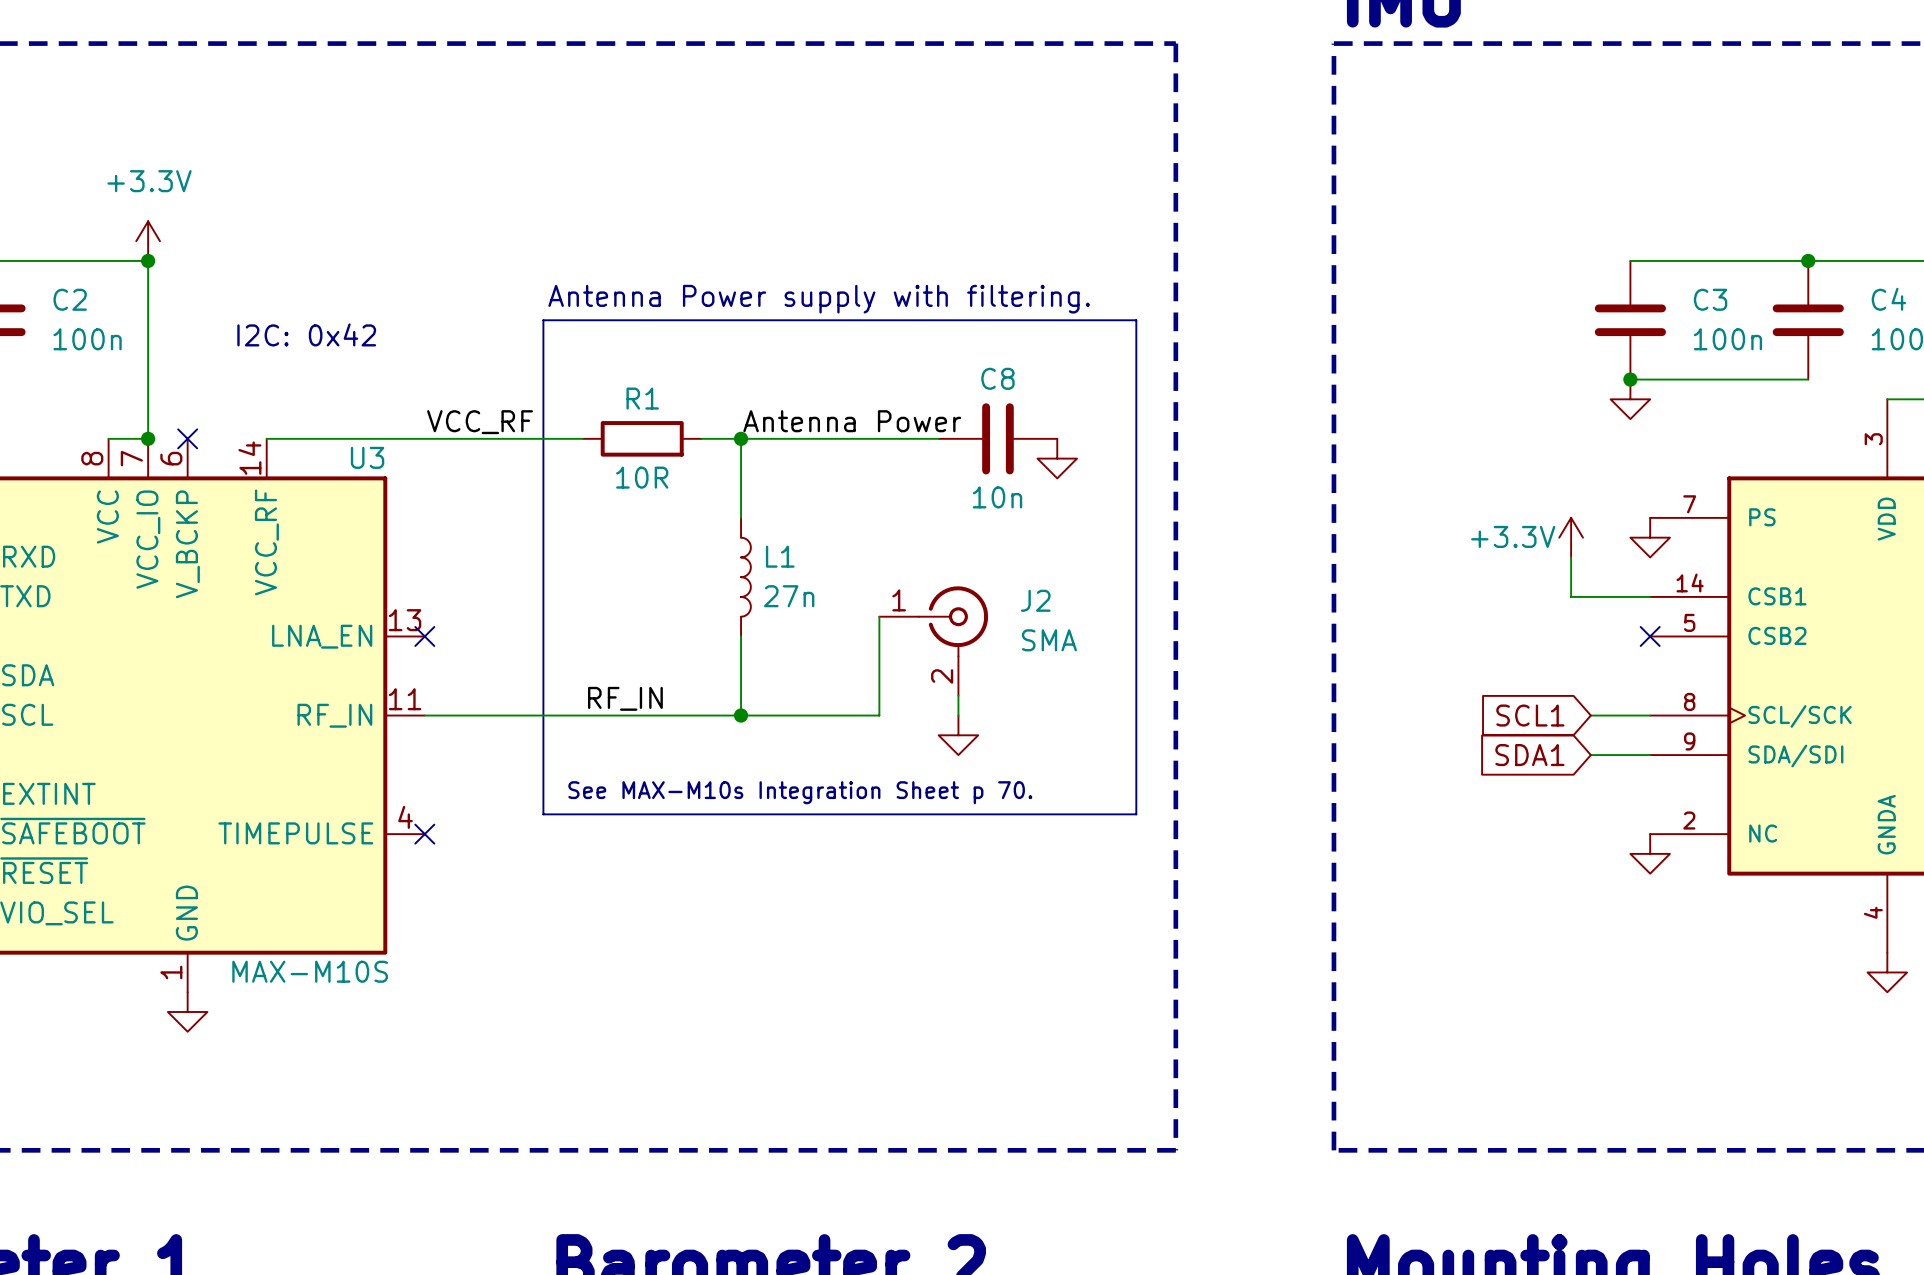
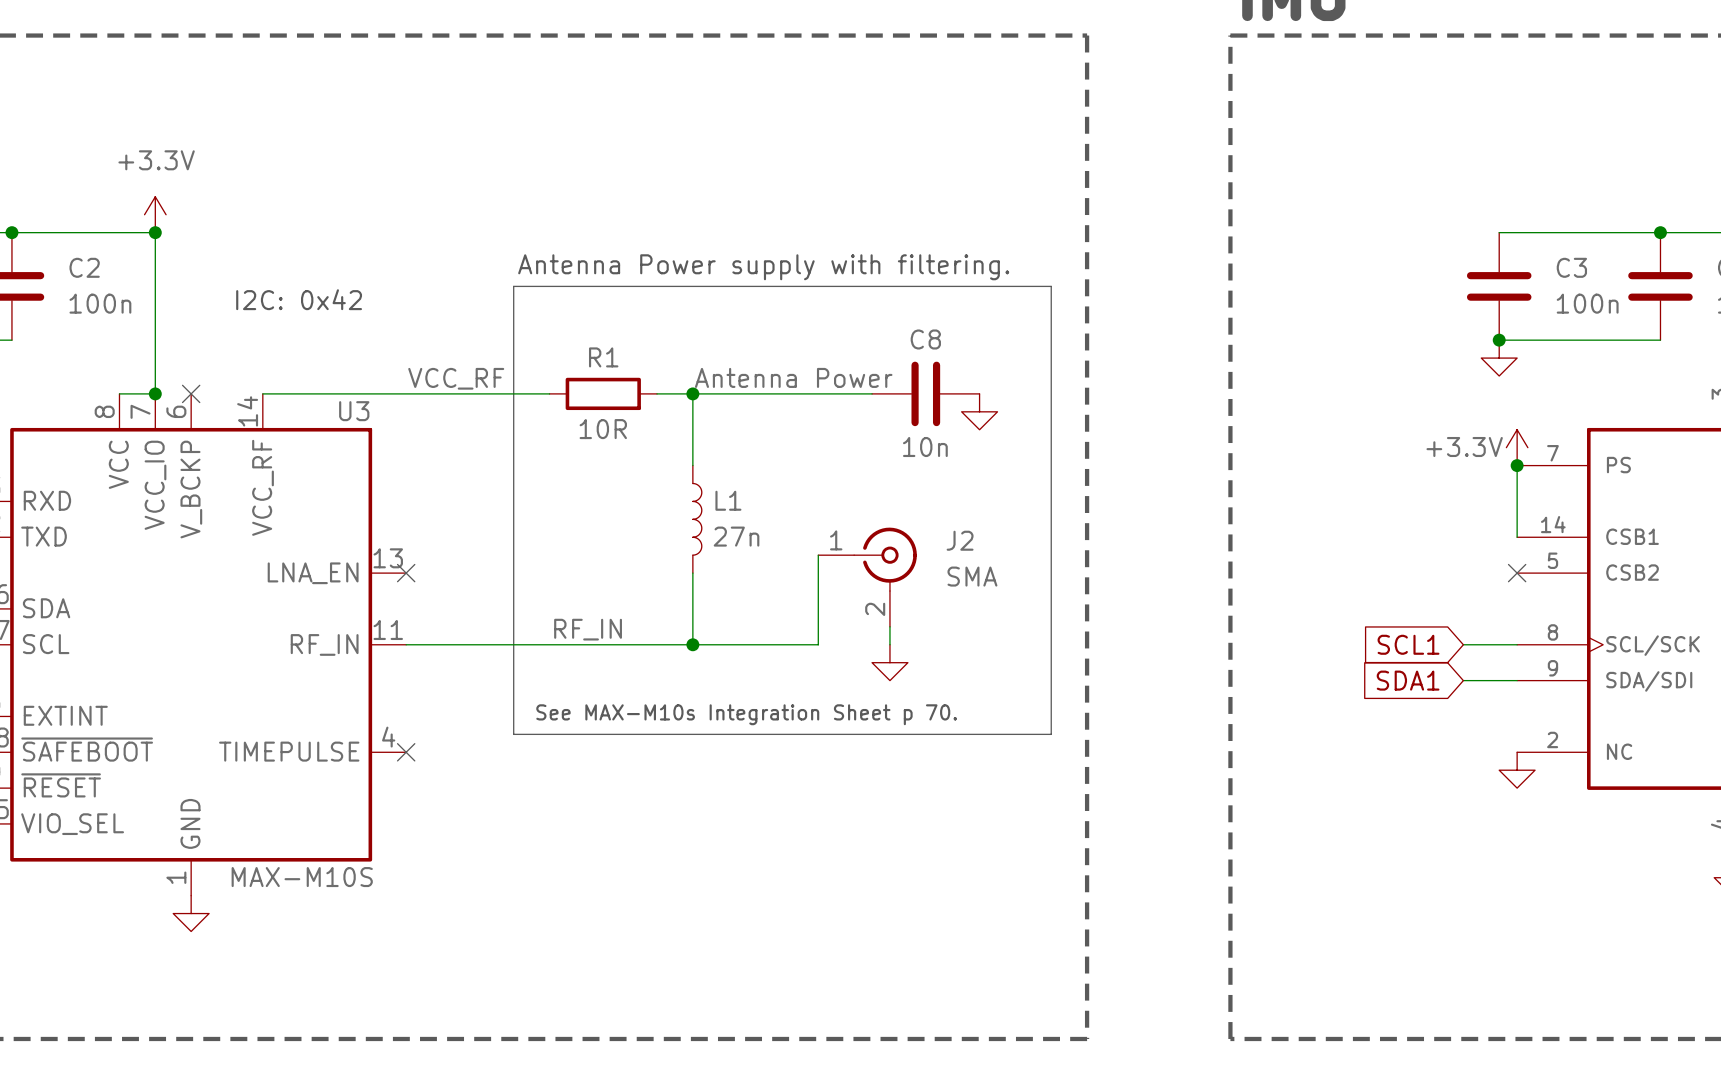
junction: none -> (1517, 465)
power symbol position: +3.3V (1571, 537) -> +3.3V (1517, 447)
power symbol: (1650, 537) -> none
wire: (1571, 557) (1571, 596) (1650, 596) -> (1517, 465) (1517, 537)

